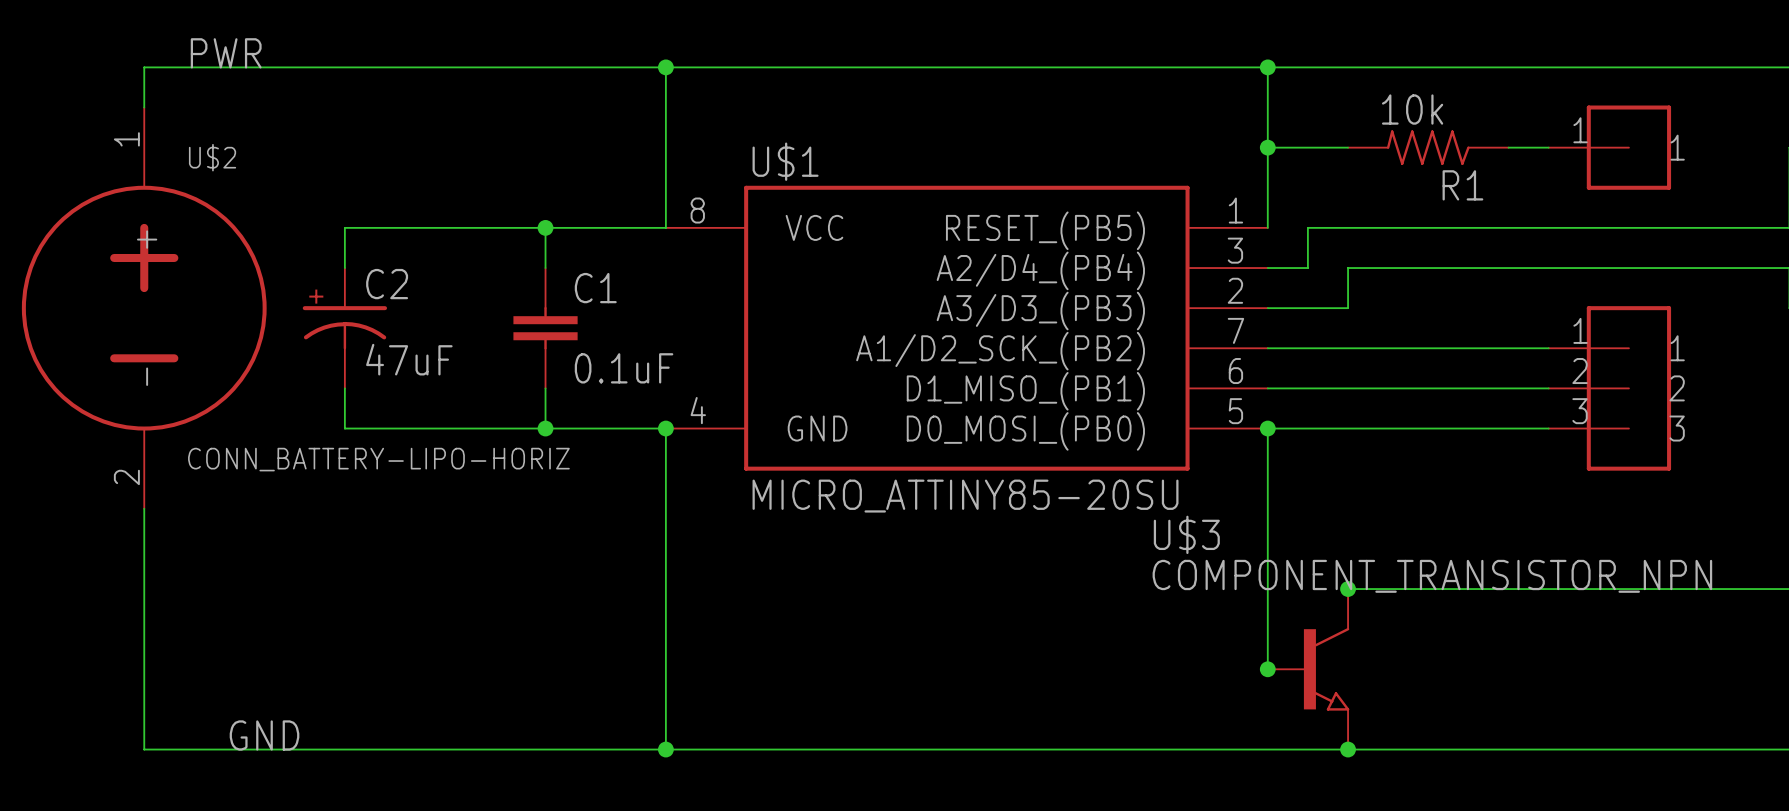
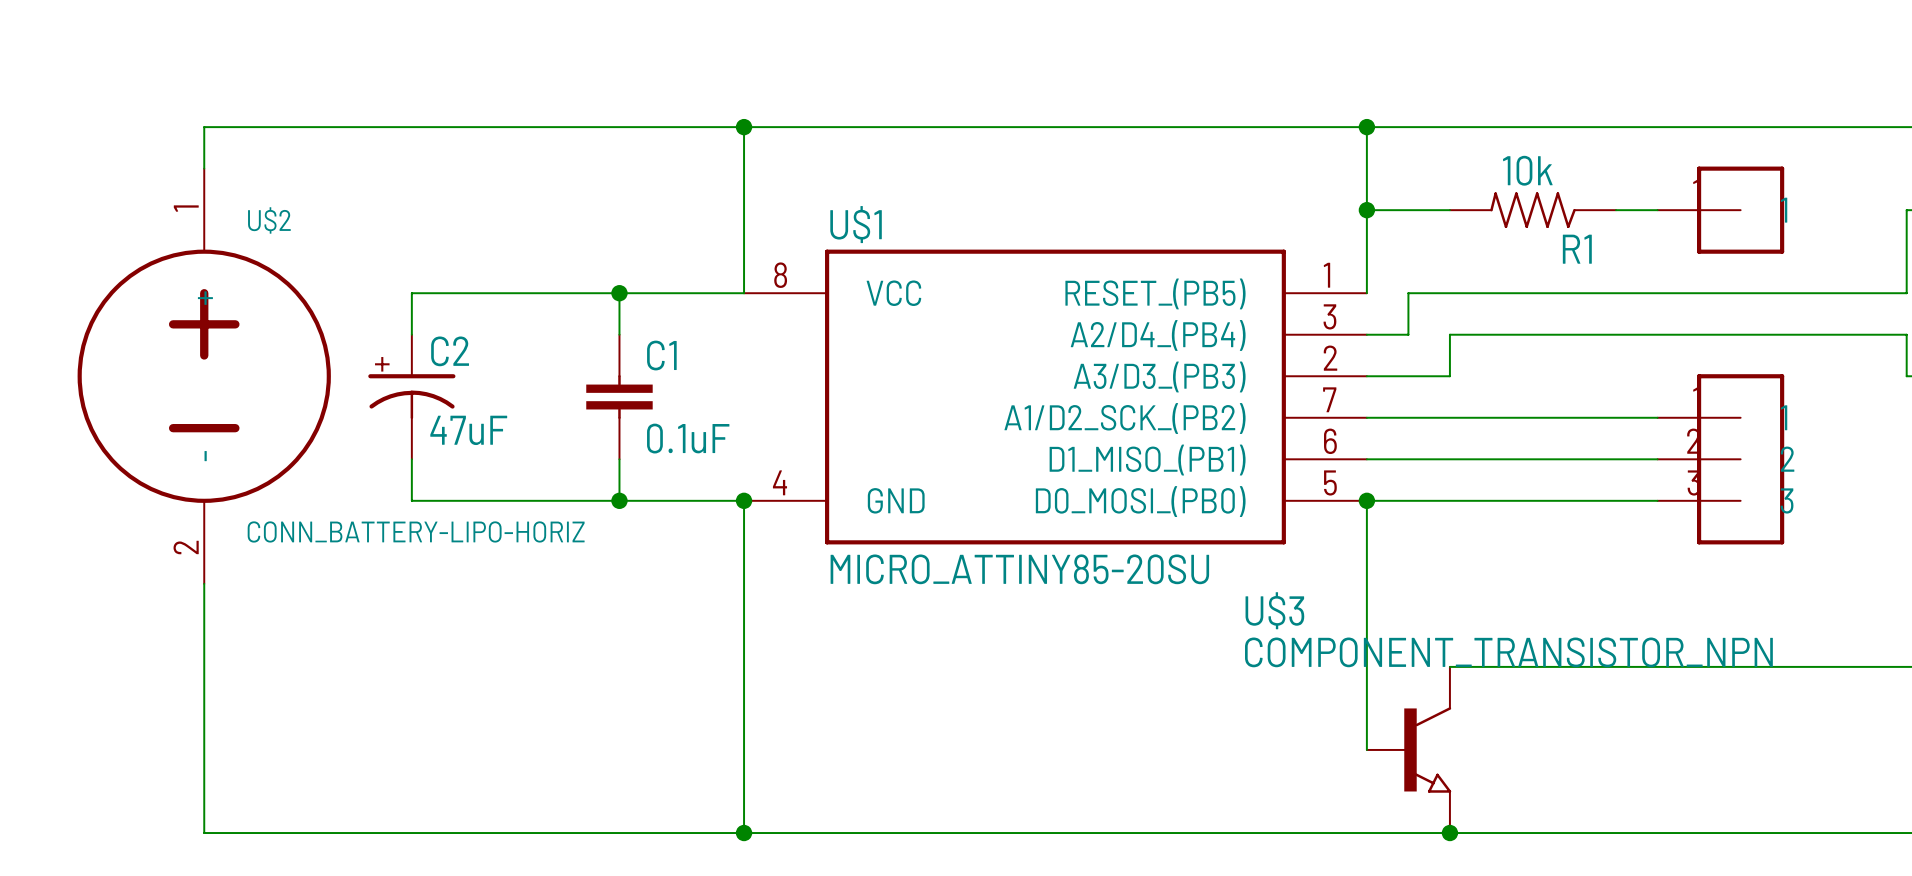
label: PWR (226, 53) -> none
junction: (1348, 589) -> none
junction: (1267, 669) -> none
label: GND (264, 735) -> none

